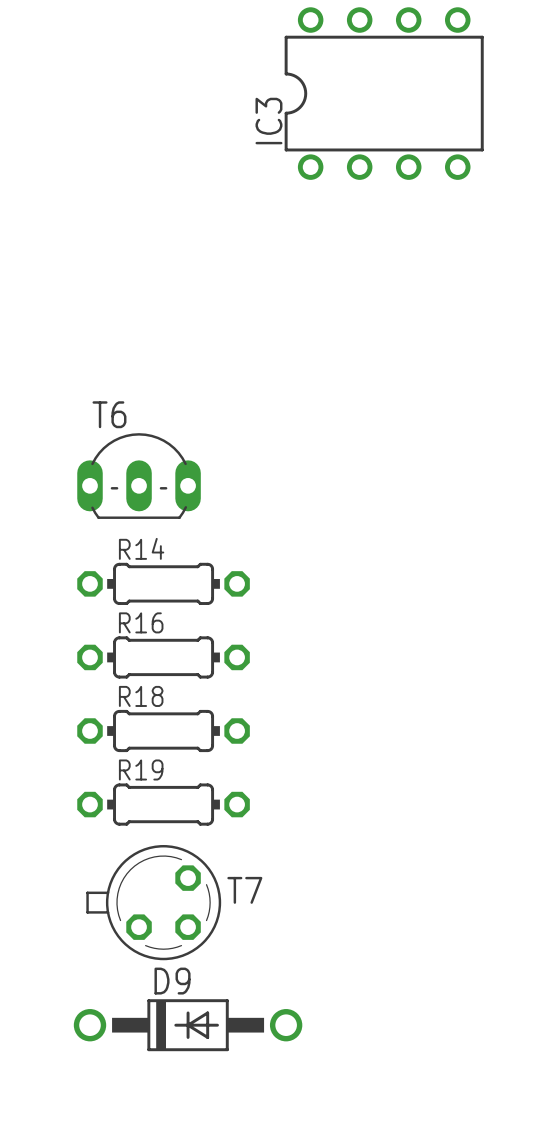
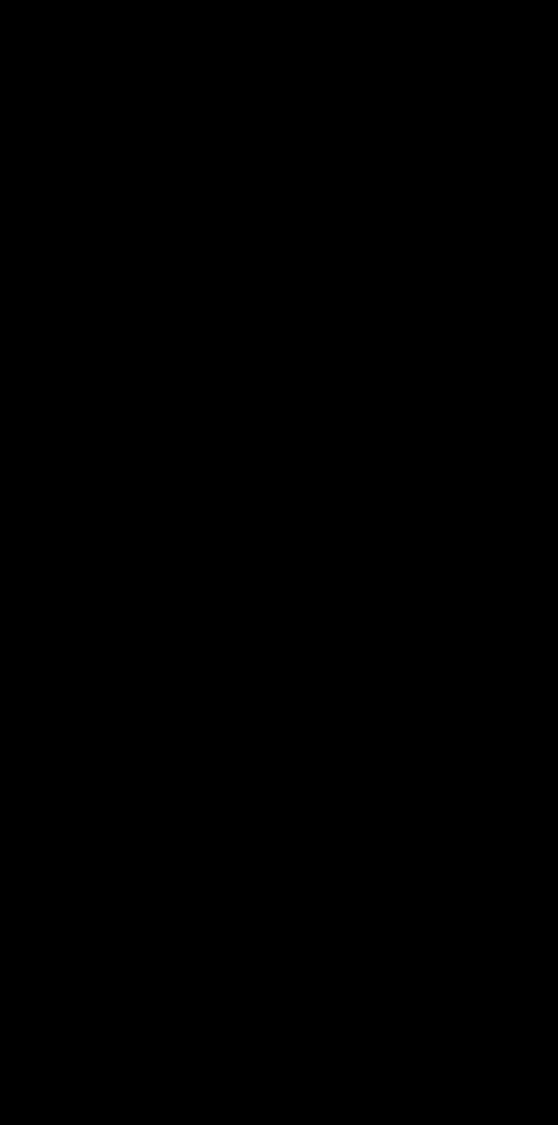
IC3: (384, 93) -> none
T6: (139, 476) -> none
R14: (163, 583) -> none
R16: (163, 657) -> none
R18: (163, 731) -> none
R19: (163, 804) -> none
T7: (153, 902) -> none
D9: (188, 1025) -> none

